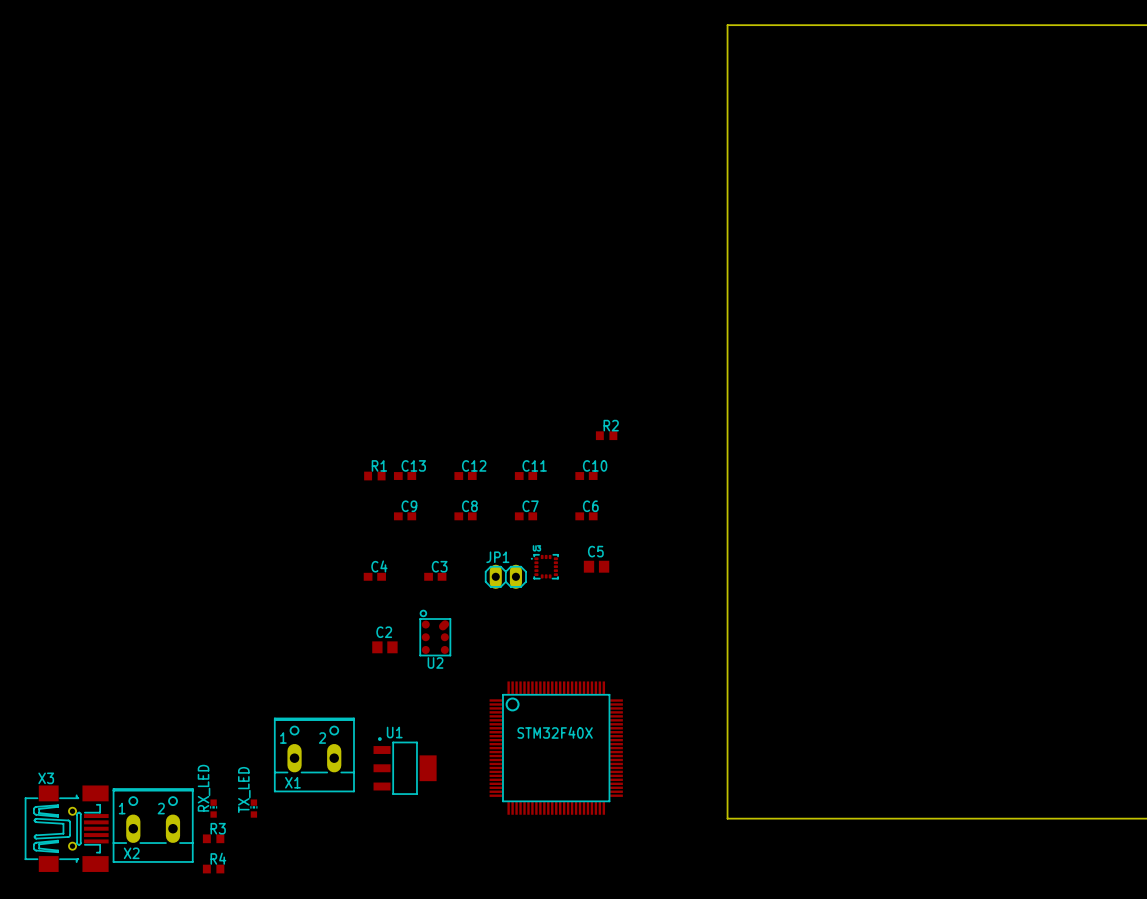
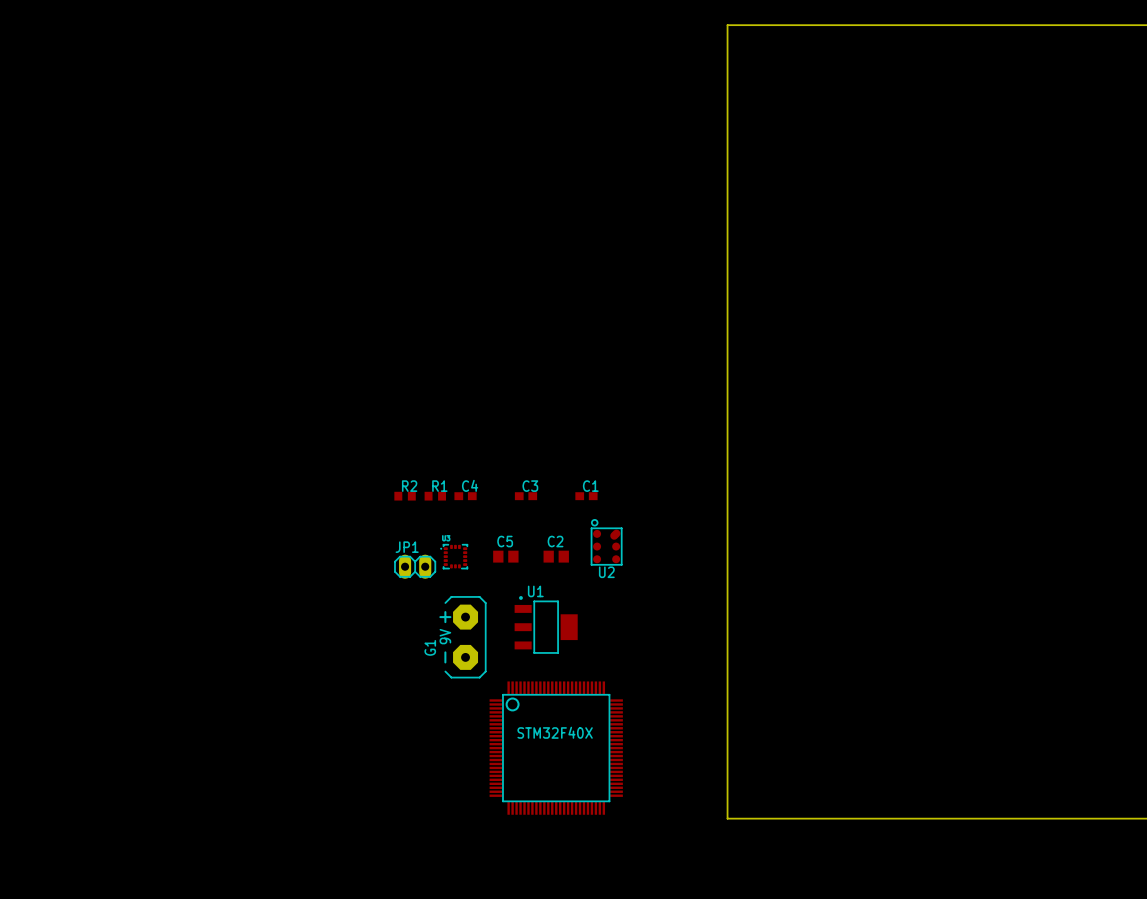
R2 position: (606, 435) -> (405, 496)
R1 position: (374, 476) -> (435, 496)
C13: (405, 476) -> none
C12: (465, 476) -> none
C11: (526, 476) -> none
C10: (586, 476) -> none
C1: none -> (586, 496)
C9: (405, 516) -> none
C8: (465, 516) -> none
C7: (526, 516) -> none
C6: (586, 516) -> none
part position: (544, 566) -> (454, 556)
C5 position: (596, 566) -> (505, 556)
C4 position: (374, 576) -> (465, 496)
C3 position: (435, 576) -> (526, 496)
JP1 position: (505, 576) -> (415, 566)
U2 position: (435, 633) -> (606, 542)
G1: none -> (462, 637)
C2 position: (384, 647) -> (556, 556)
X1: (314, 754) -> none
U1 position: (405, 766) -> (546, 625)
RX_LED: (213, 808) -> none
TX_LED: (253, 808) -> none
X2: (153, 825) -> none
X3: (66, 828) -> none
R3: (213, 838) -> none
R4: (213, 869) -> none

